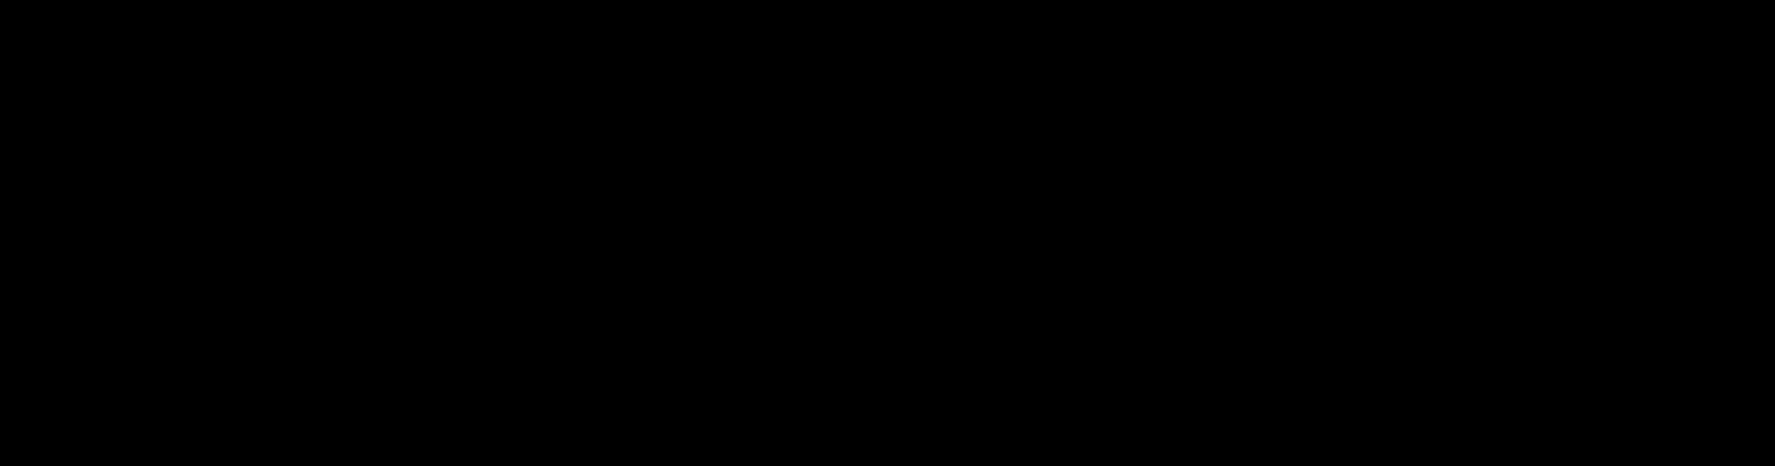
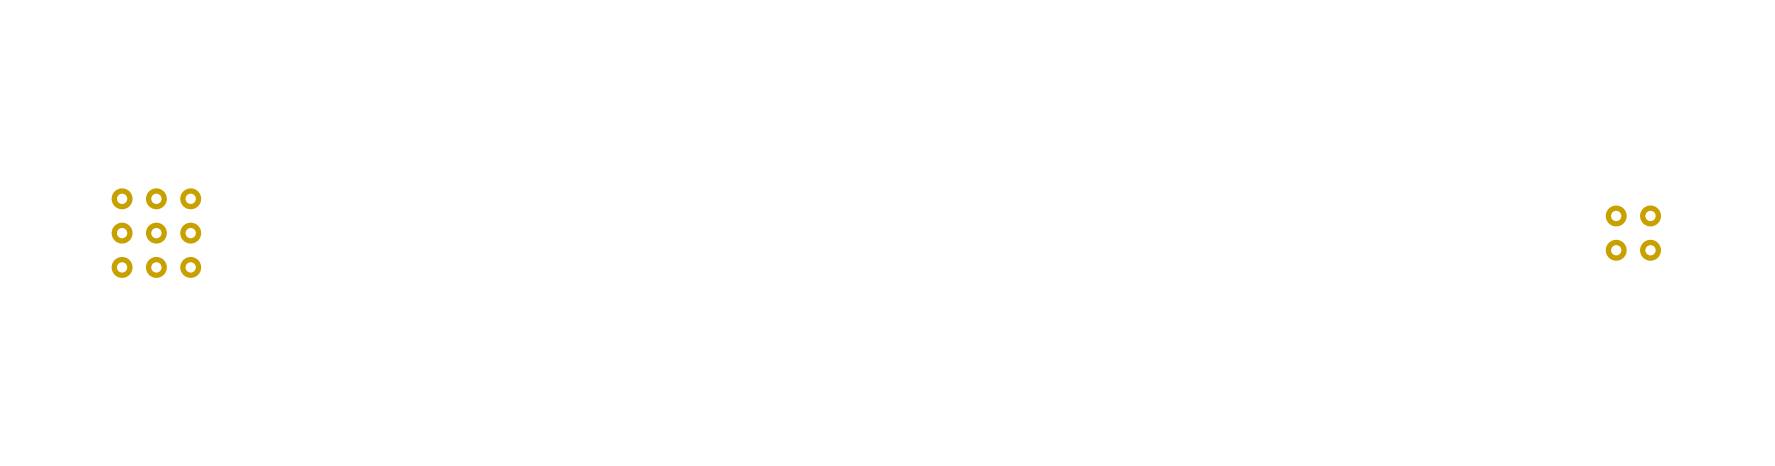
part: none -> (156, 233)
part: none -> (1633, 233)

